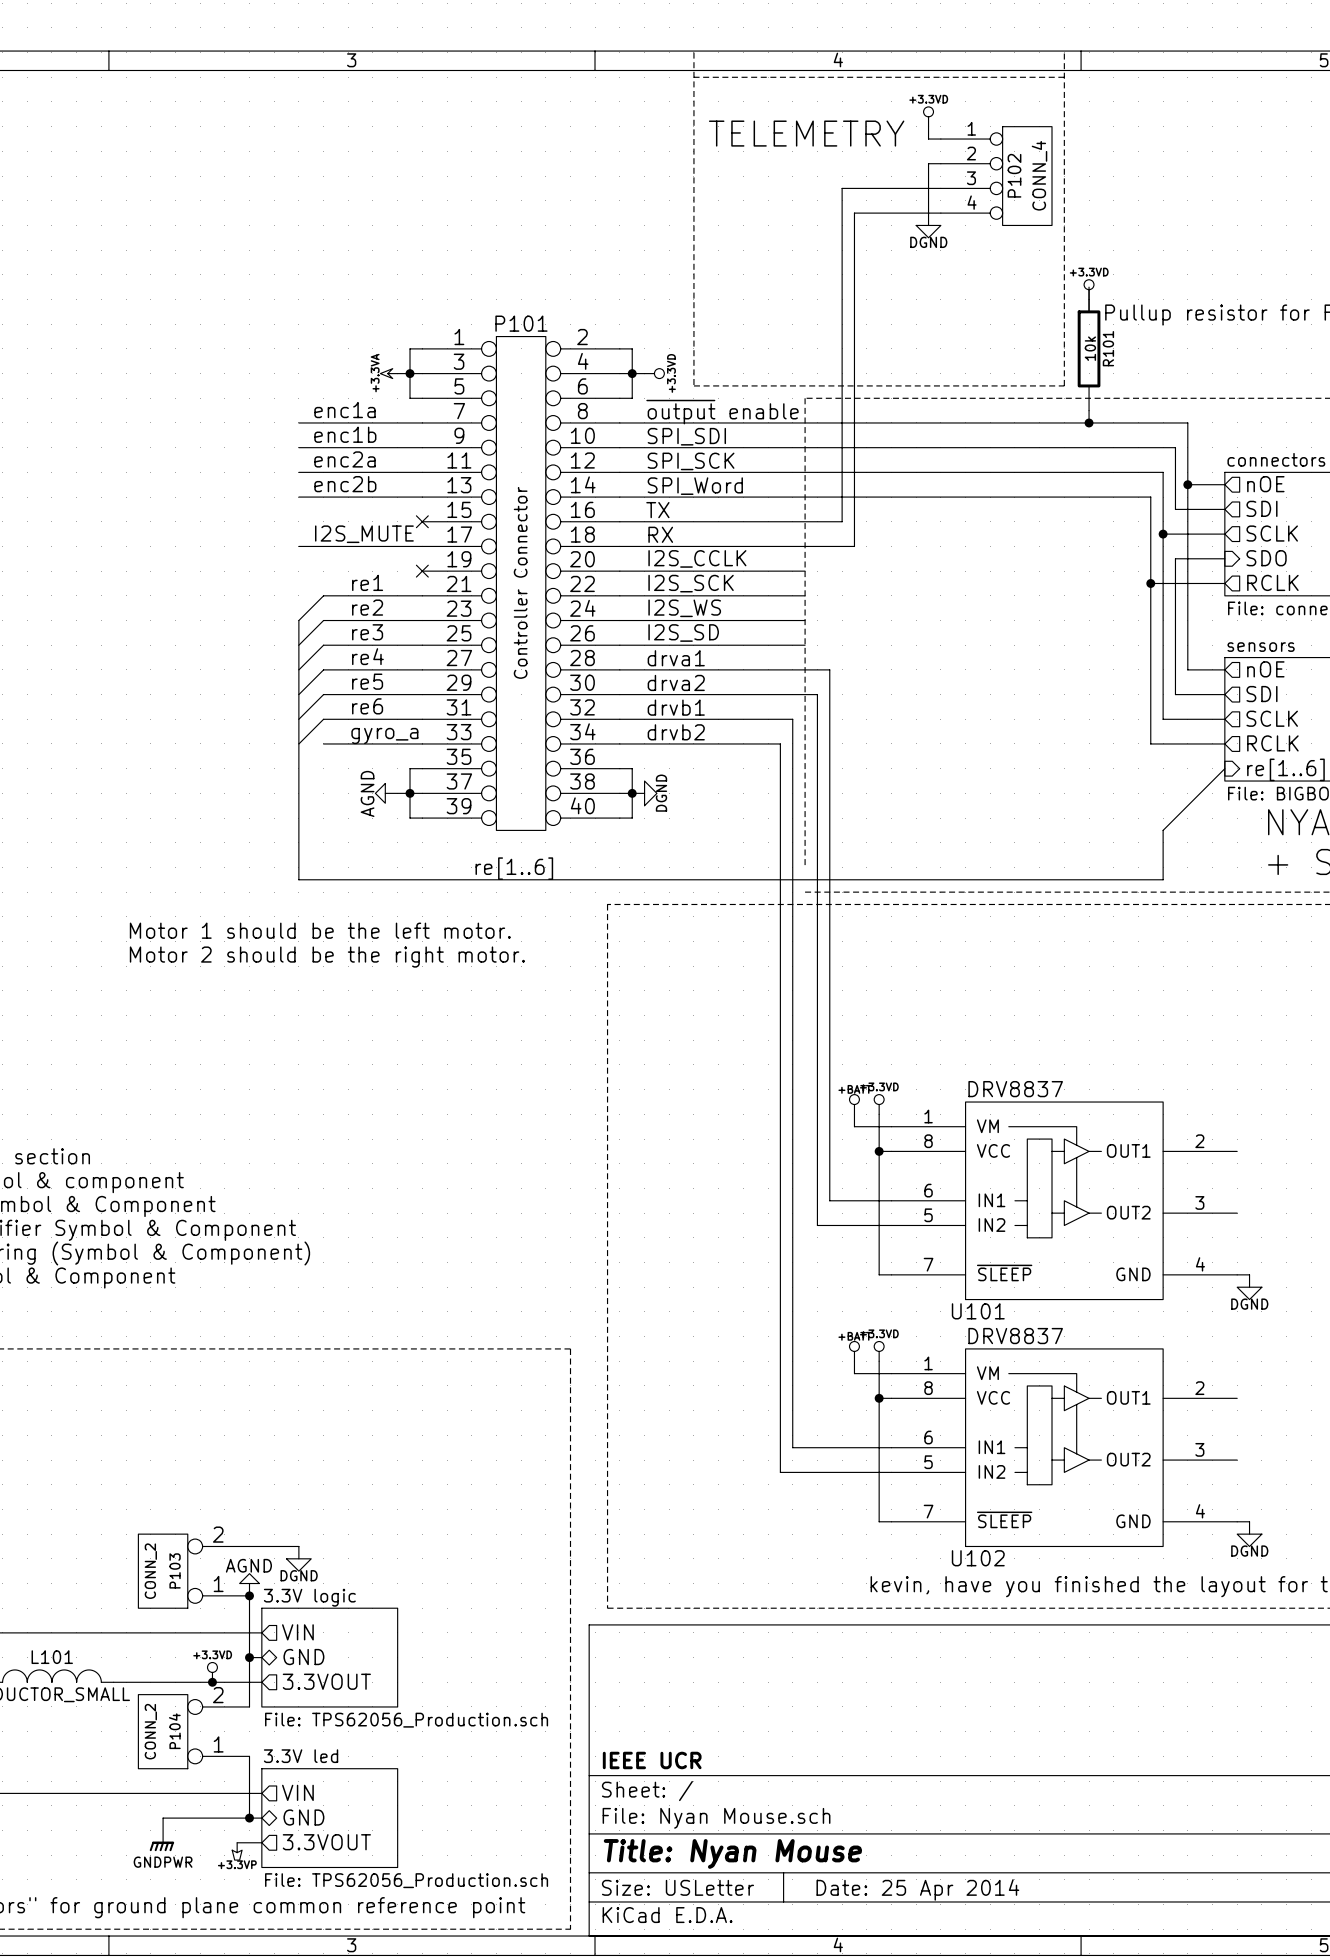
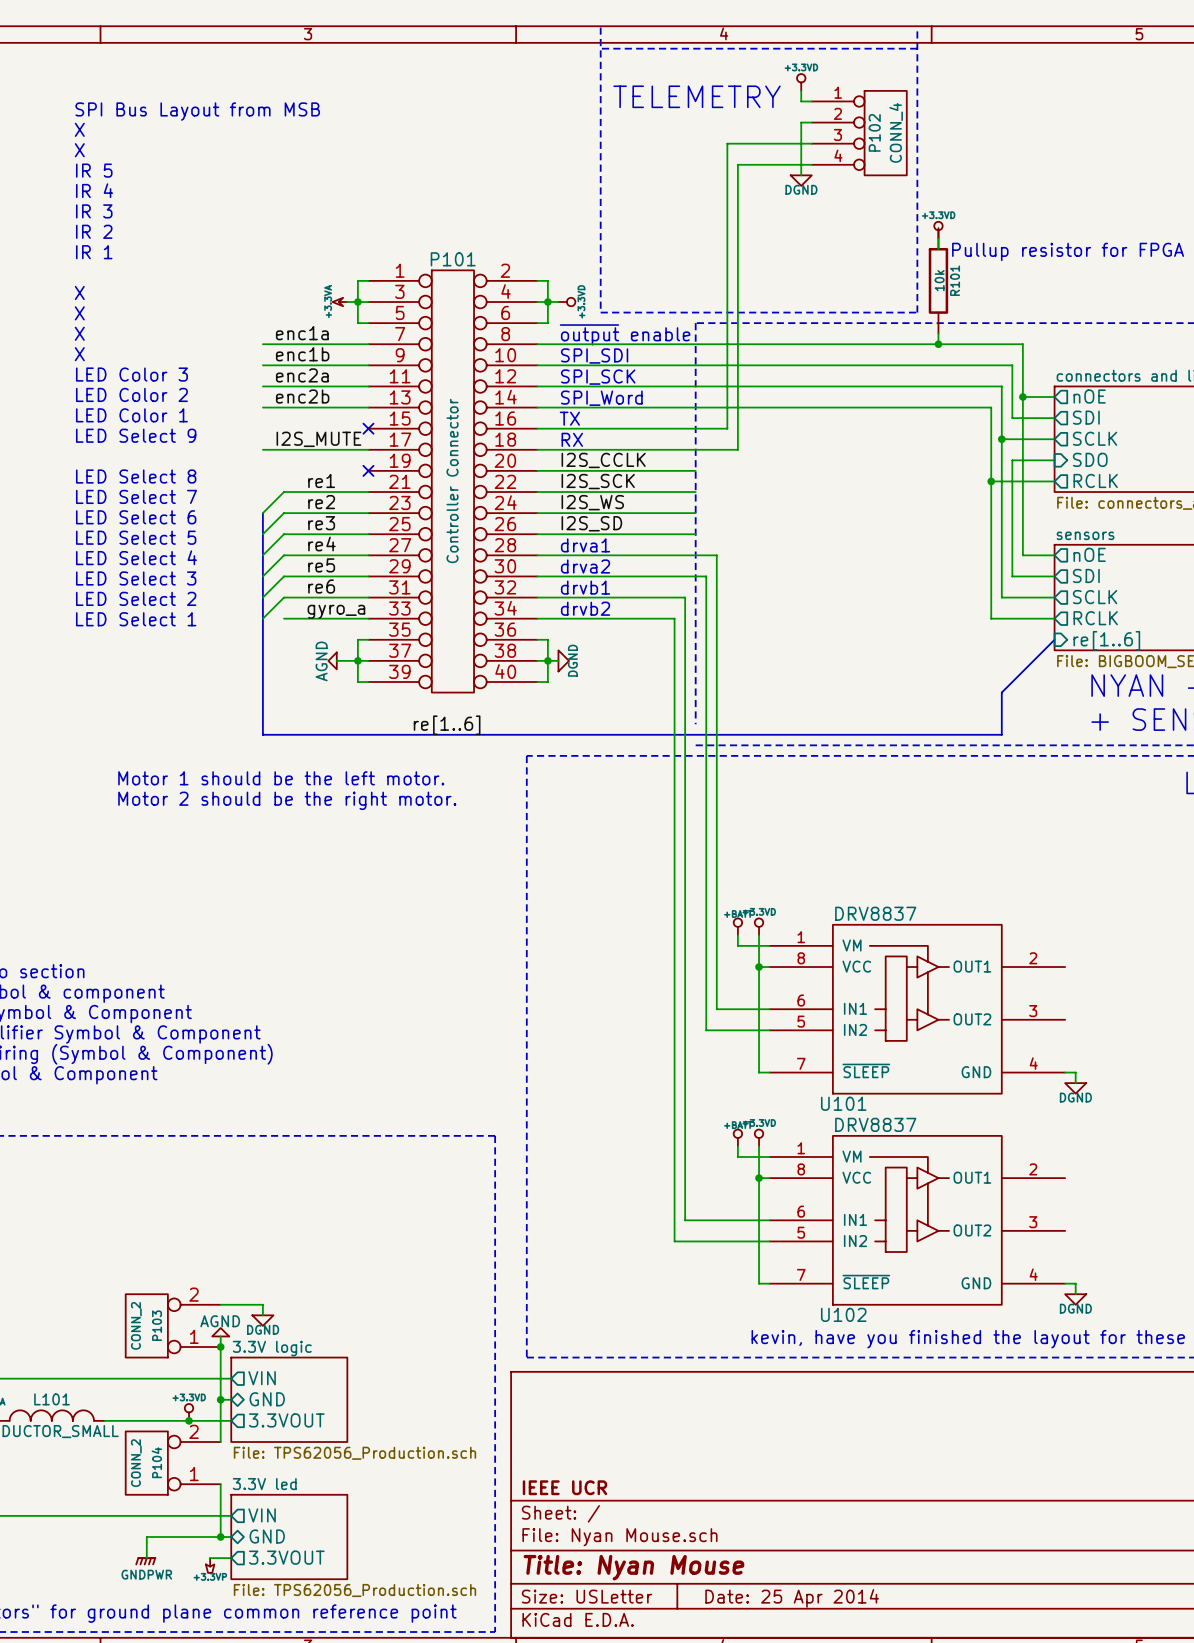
text: none -> SPI Bus Layout from MSB (197, 111)
text: none -> X (79, 129)
text: none -> X (79, 150)
text: none -> IR 5 (94, 170)
text: none -> IR 4 (94, 190)
text: none -> IR 3 (94, 211)
text: none -> IR 2 (94, 231)
text: none -> IR 1 (94, 252)
text: none -> X (79, 292)
text: none -> X (79, 313)
text: none -> X (79, 333)
text: none -> X (79, 354)
text: none -> LED Color 3 (131, 374)
text: none -> LED Color 2 (131, 394)
text: none -> LED Color 1 (131, 415)
text: none -> LED Select 9 (136, 435)
text: none -> LED Select 8 (136, 476)
text: none -> LED Select 7 (136, 496)
text: none -> LED Select 6 (136, 517)
text: none -> LED Select 5 (136, 537)
text: none -> LED Select 4 (136, 557)
text: none -> LED Select 3 (136, 578)
text: none -> LED Select 2 (136, 598)
text: none -> LED Select 1 (136, 619)

